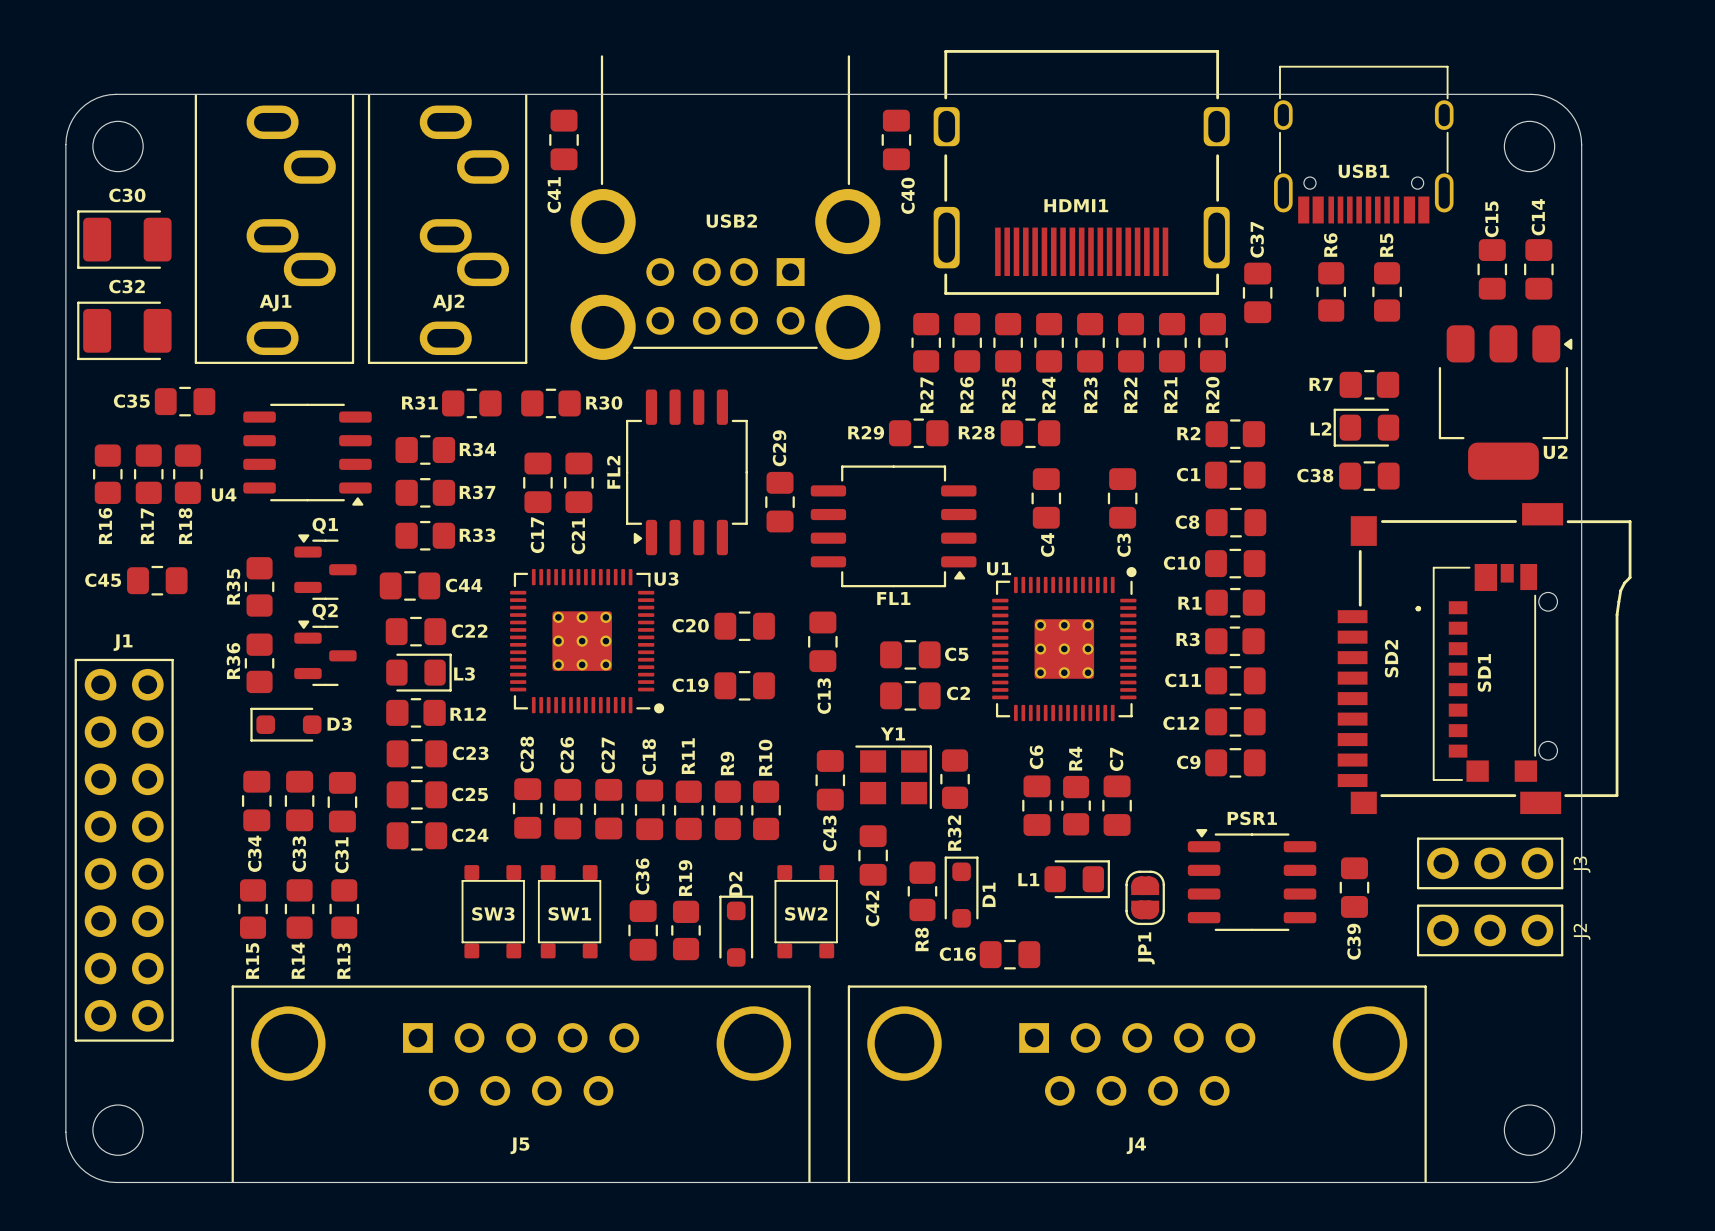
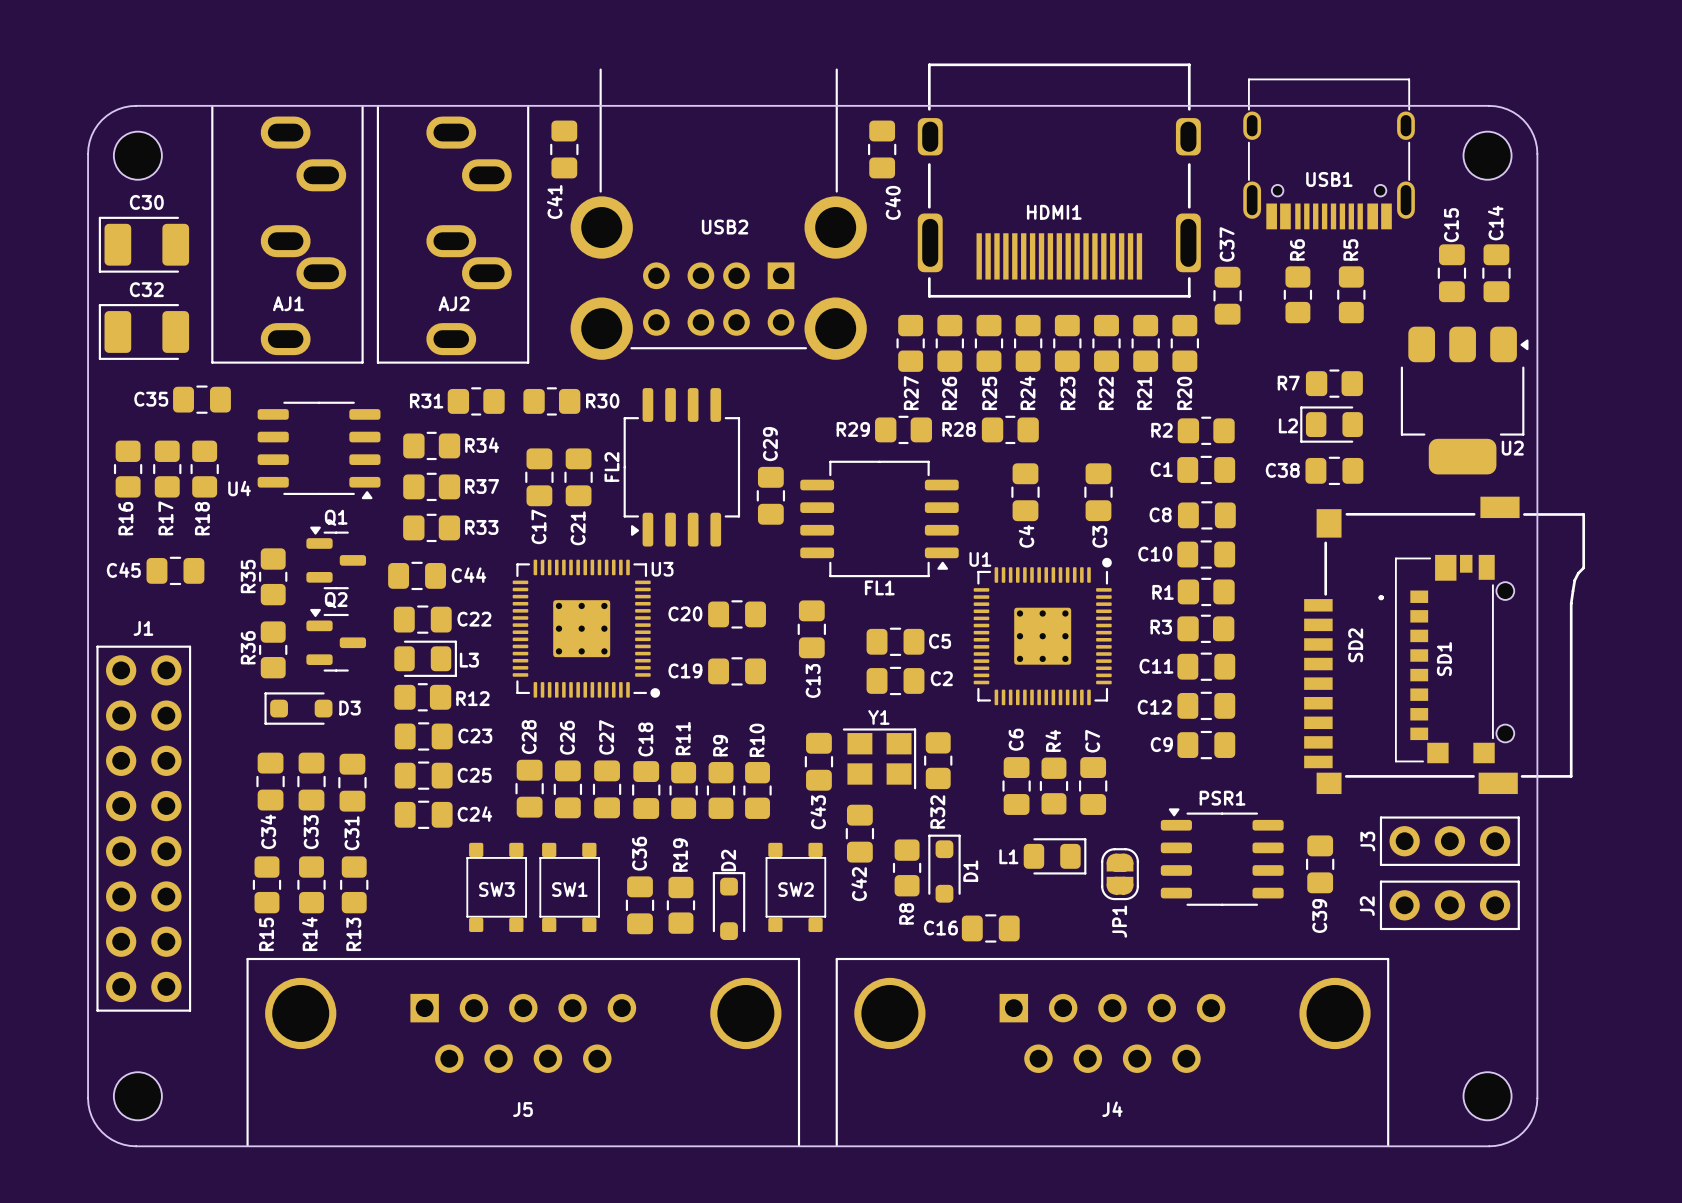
J3 name position: J3 (1582, 864) -> J3 (1367, 841)
J2 name position: J2 (1582, 931) -> J2 (1367, 906)

